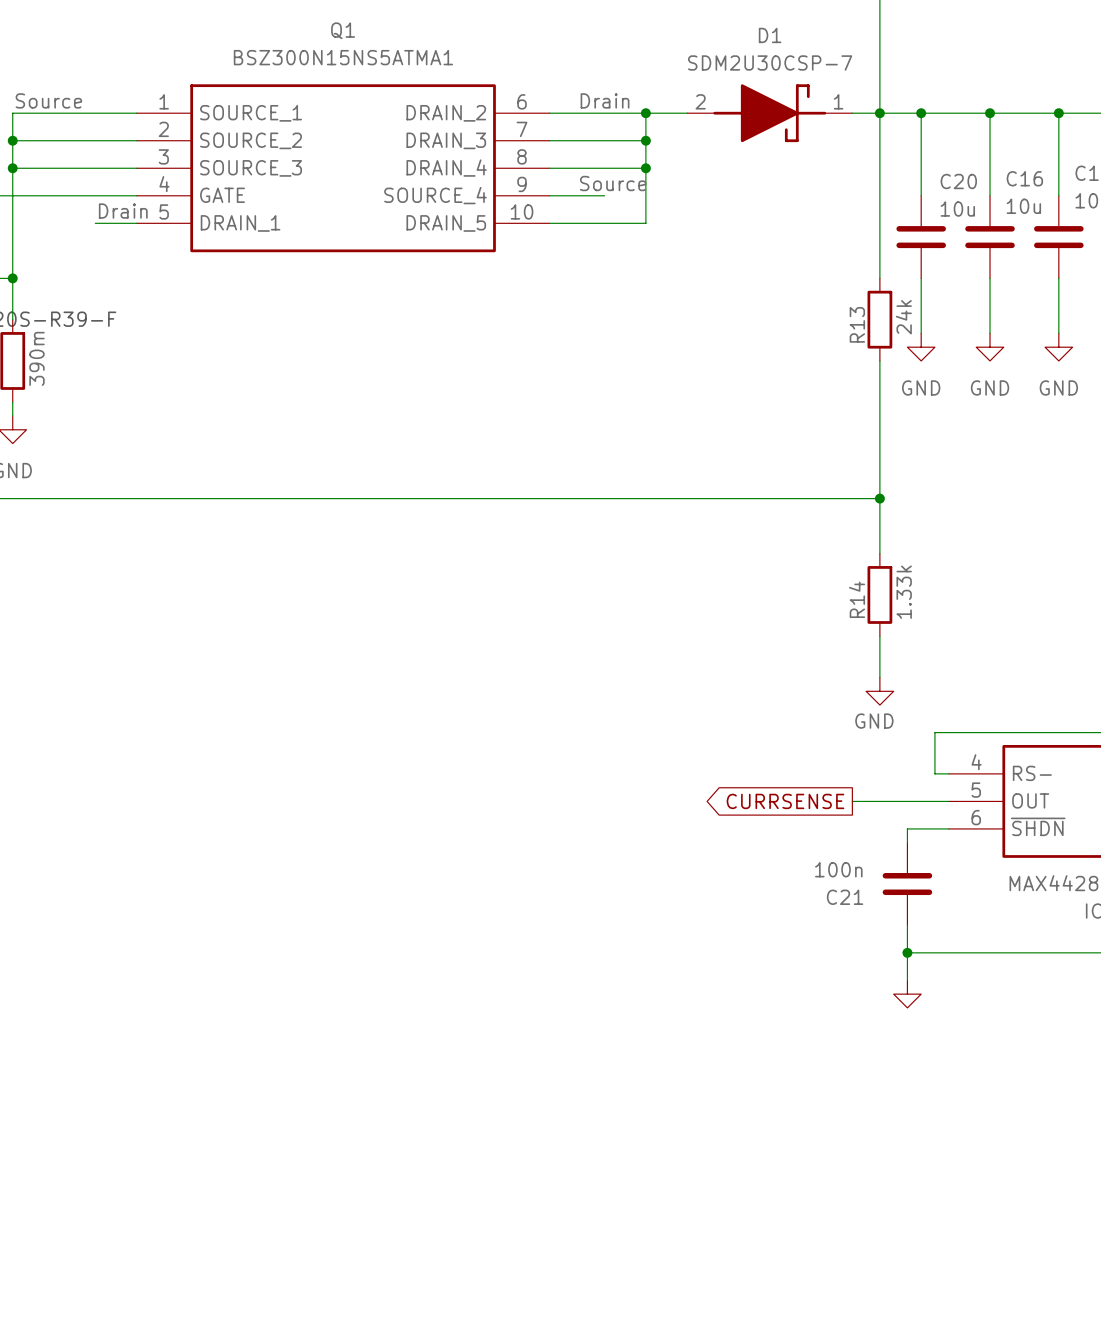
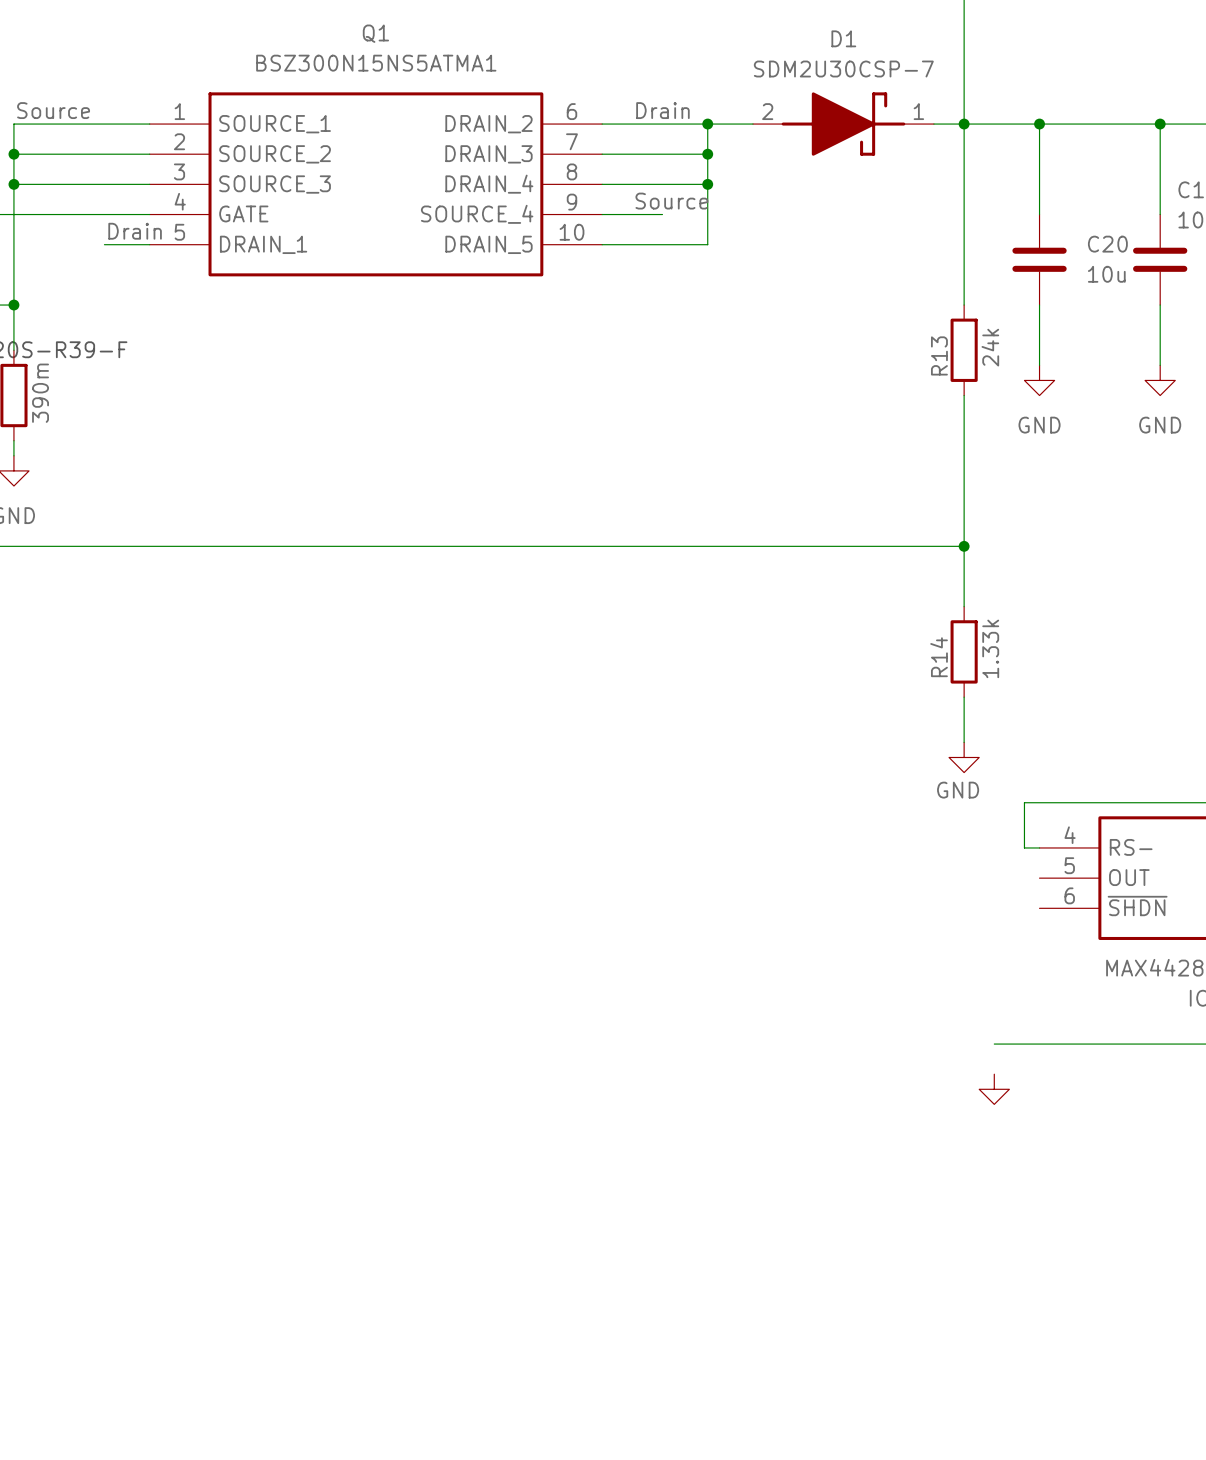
wire: (921, 113) (921, 195) -> (1039, 124) (1039, 214)
junction: (921, 113) -> none
junction: none -> (1039, 124)
wire: (990, 113) (990, 195) -> none
junction: (990, 113) -> none
C20 name position: C20 (958, 181) -> C20 (1107, 244)
C20 value position: 10u (957, 209) -> 10u (1106, 274)
C20 position: (921, 237) -> (1039, 259)
C16: 10u (990, 237) -> none
wire: (921, 278) (921, 333) -> (1039, 305) (1039, 365)
wire: (990, 278) (990, 333) -> none
power symbol: GND (921, 347) -> none
power symbol: none -> GND (1039, 380)
power symbol: GND (990, 347) -> none
global label: CURRSENSE (785, 801) -> none
wire: (852, 801) (948, 801) -> none
wire: (948, 828) (907, 828) (907, 842) -> none
C21: 100n (907, 884) -> none
wire: (907, 925) (907, 980) -> none
junction: (907, 952) -> none

